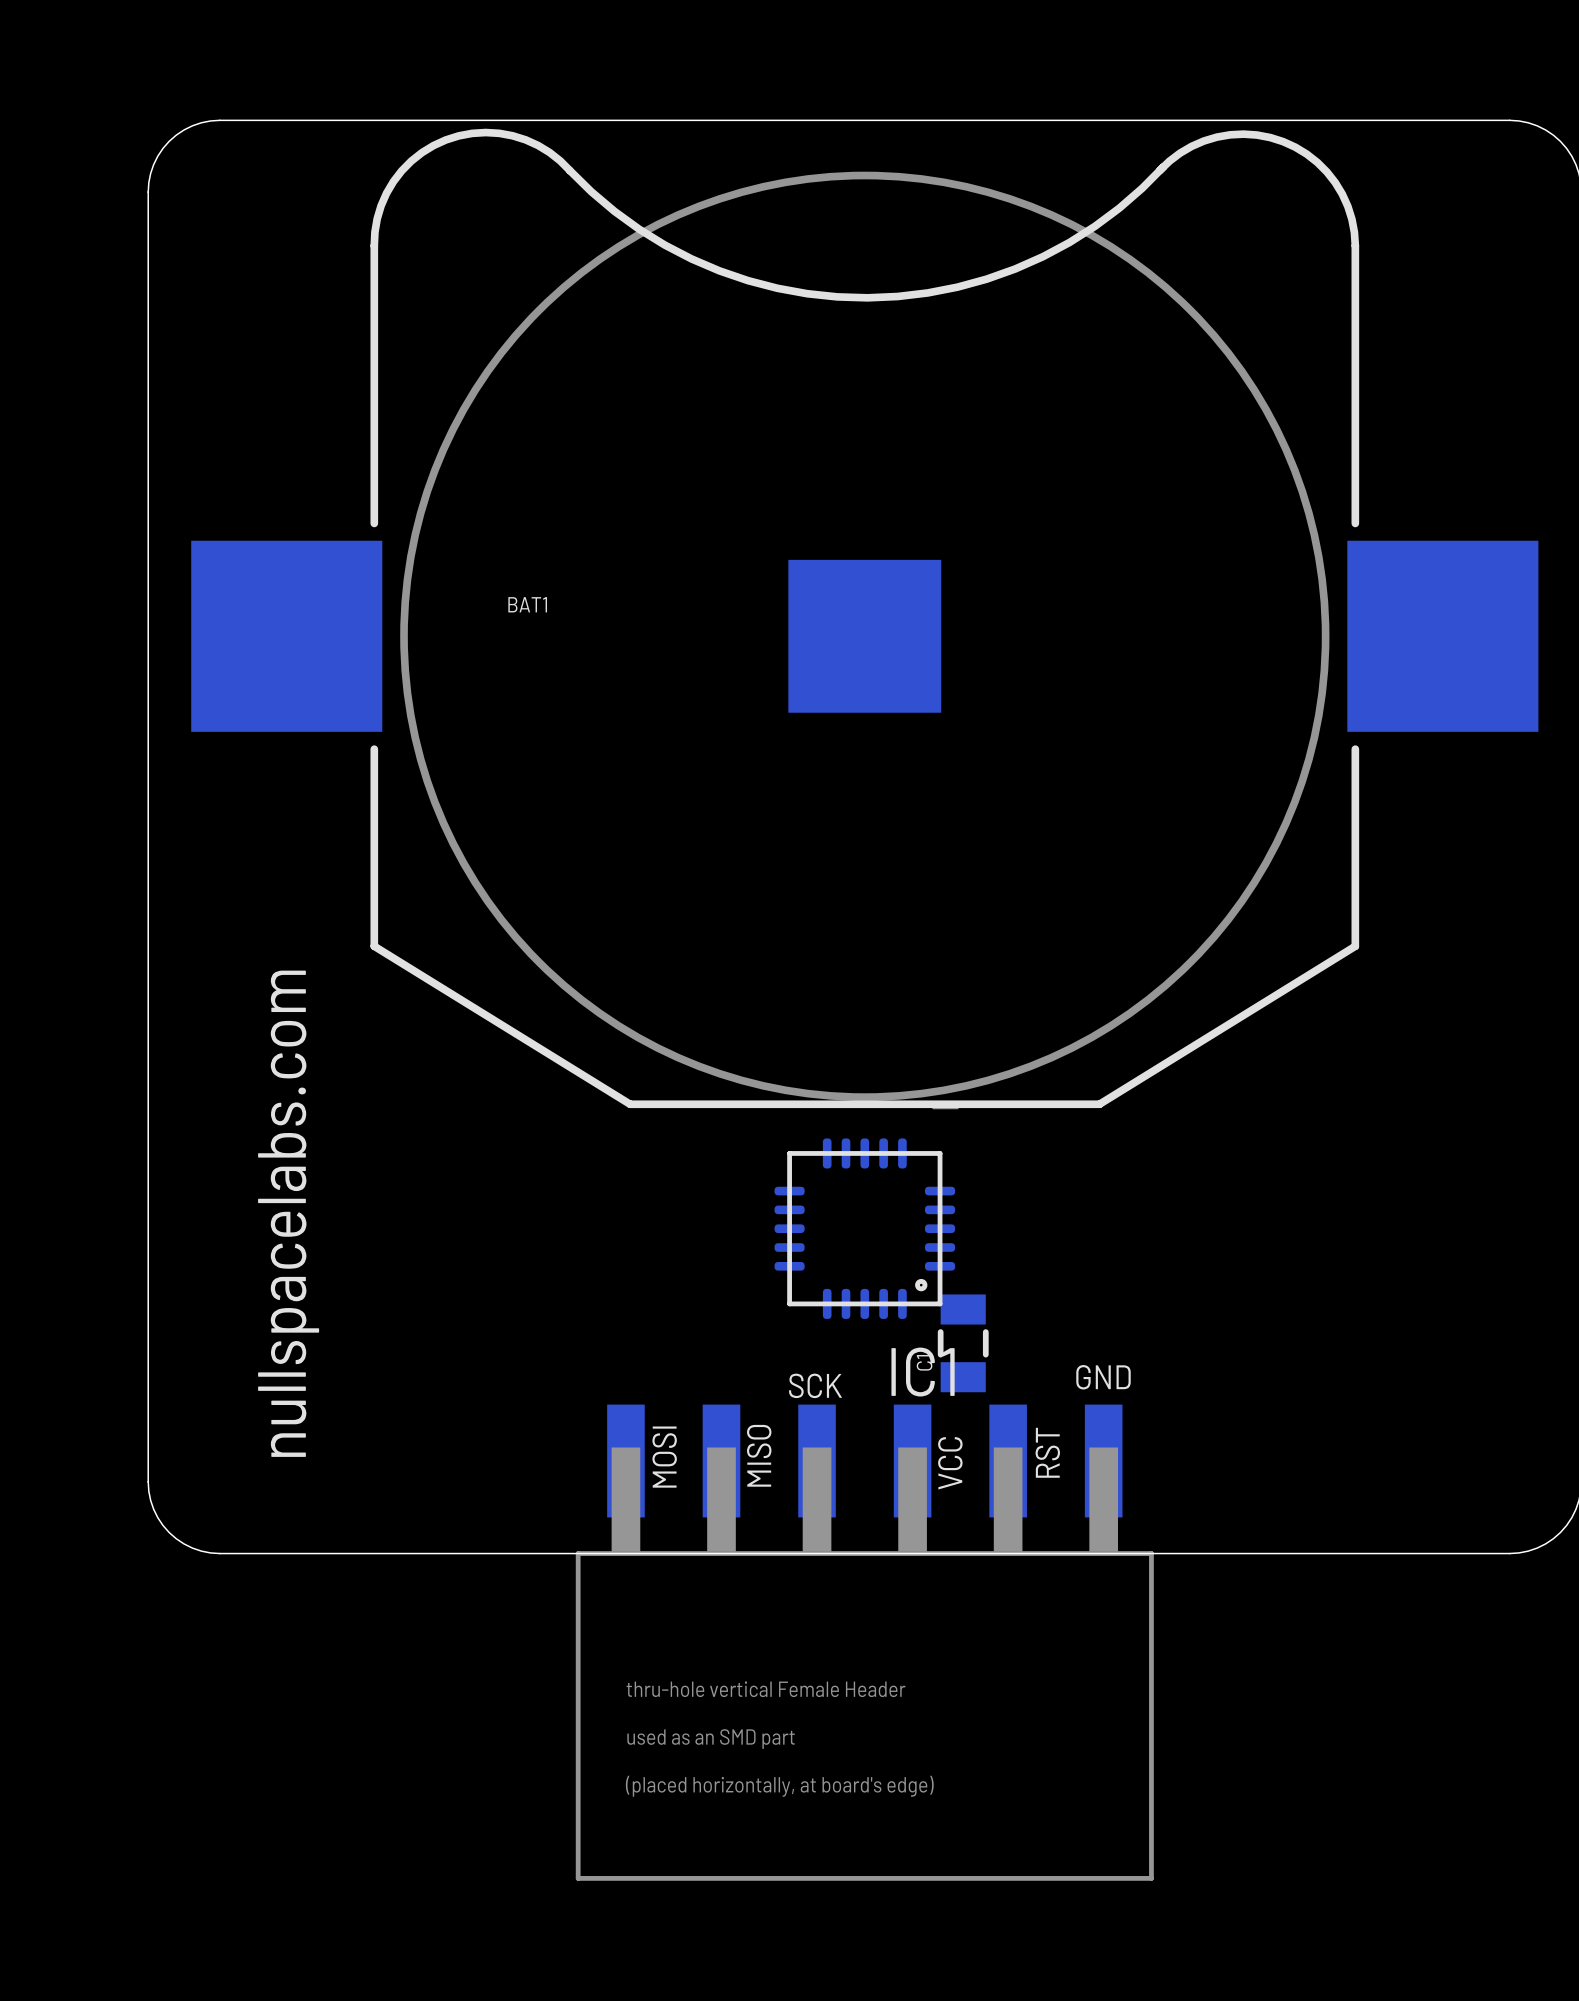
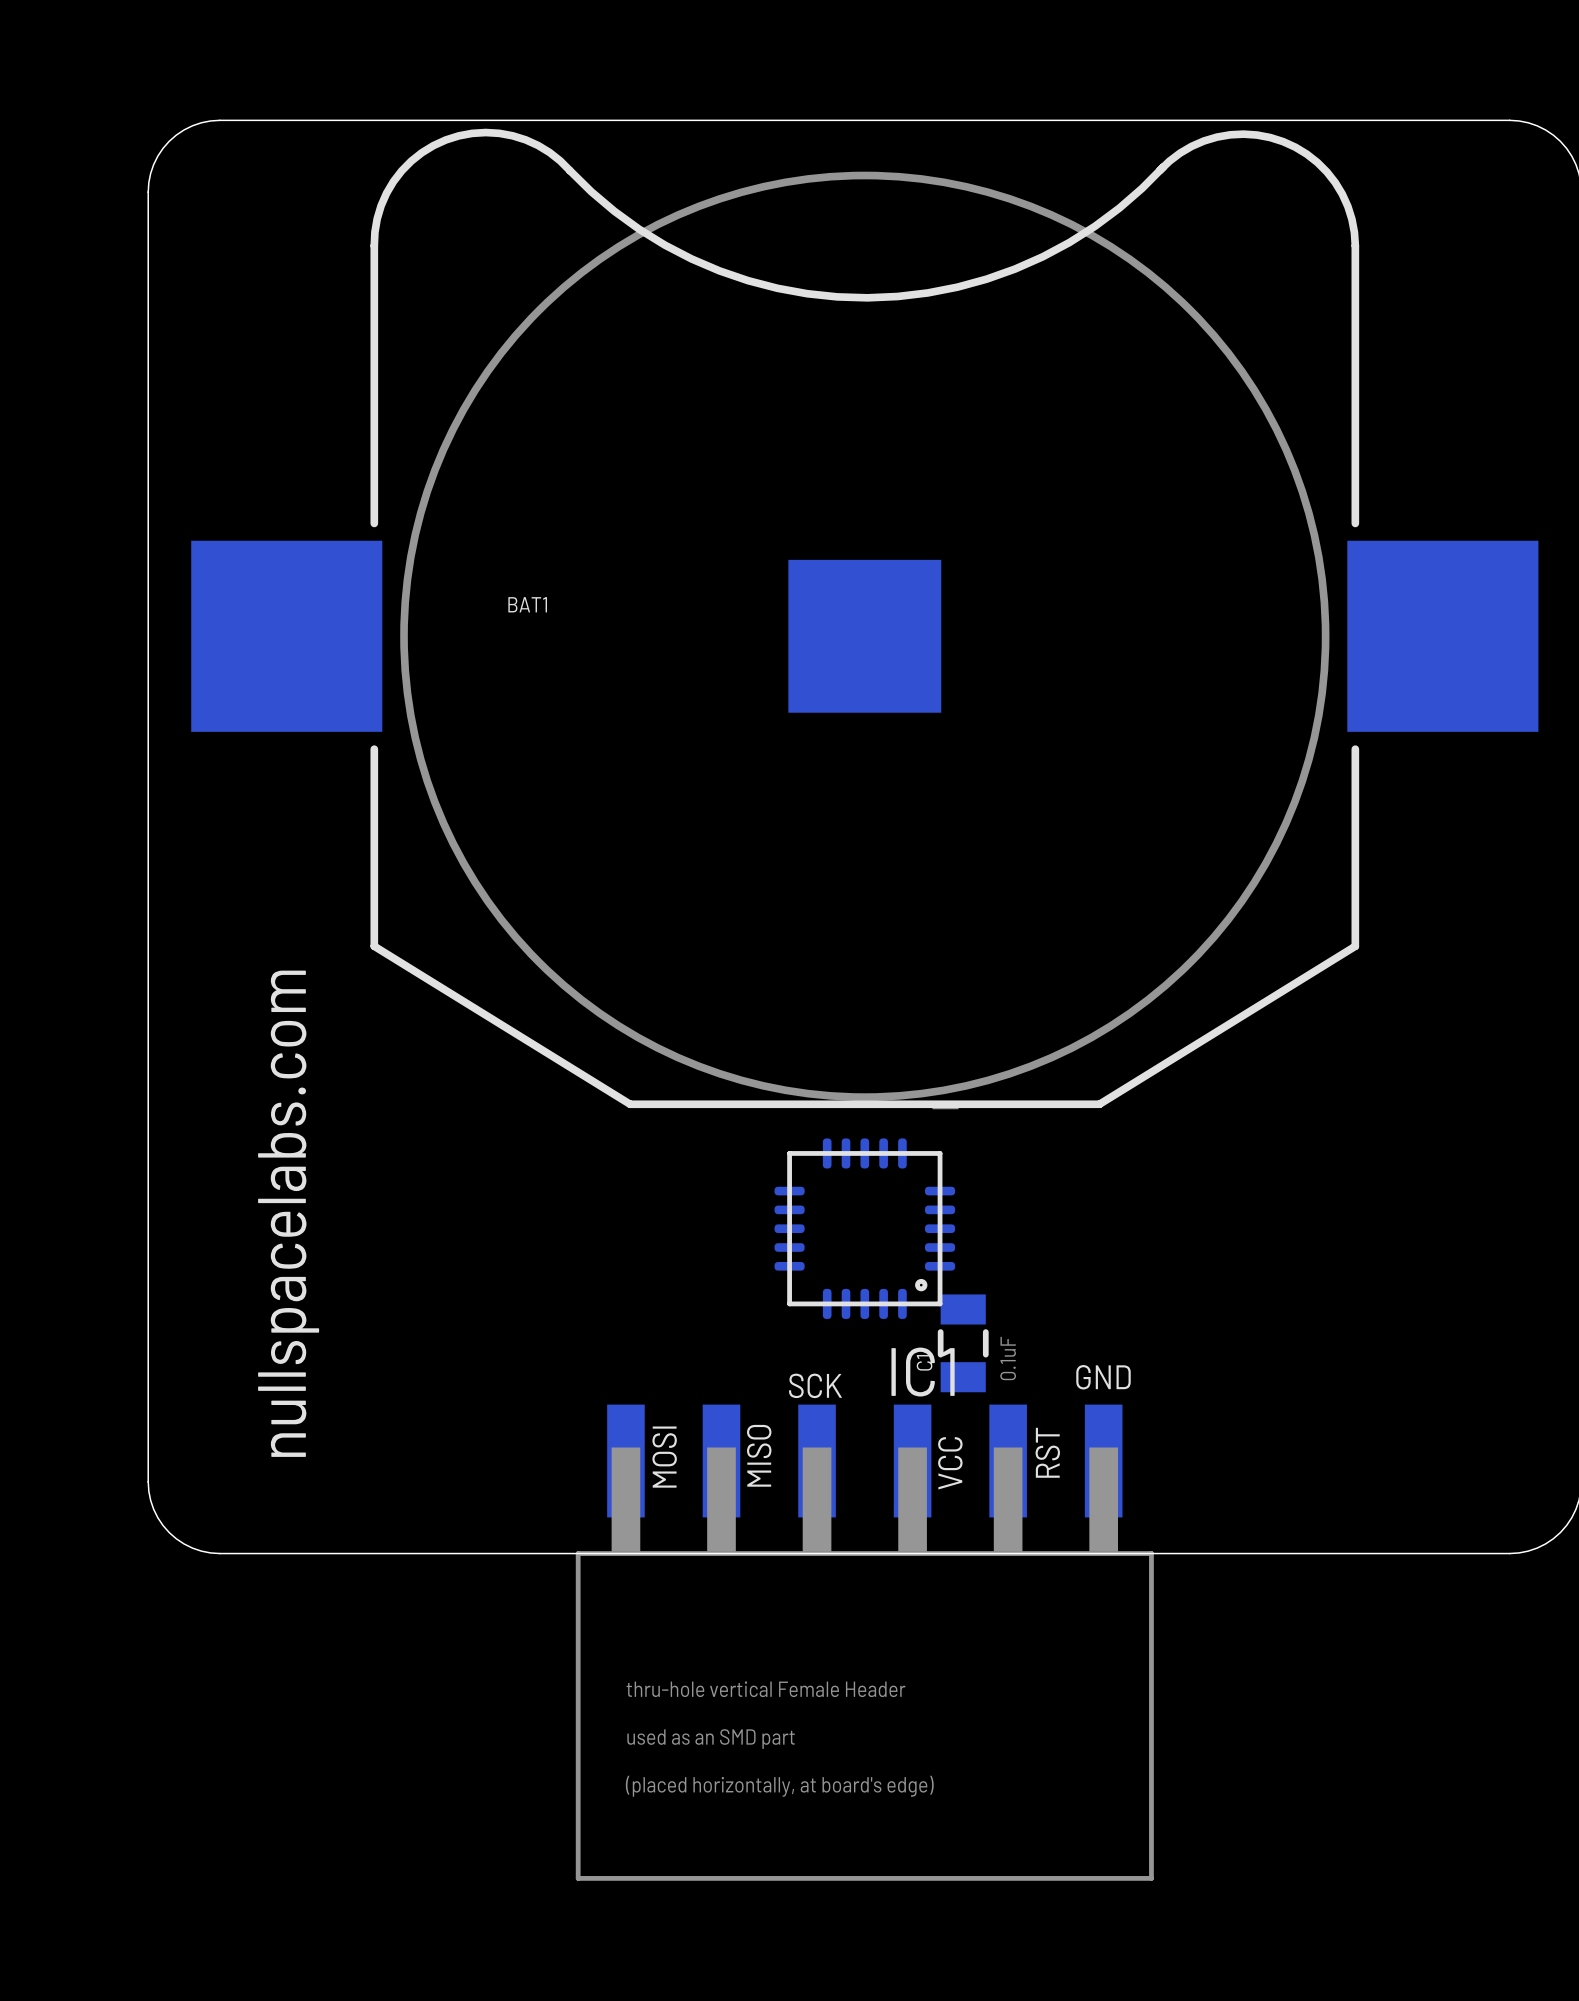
C1 value: none -> 0.1uF (1008, 1358)

